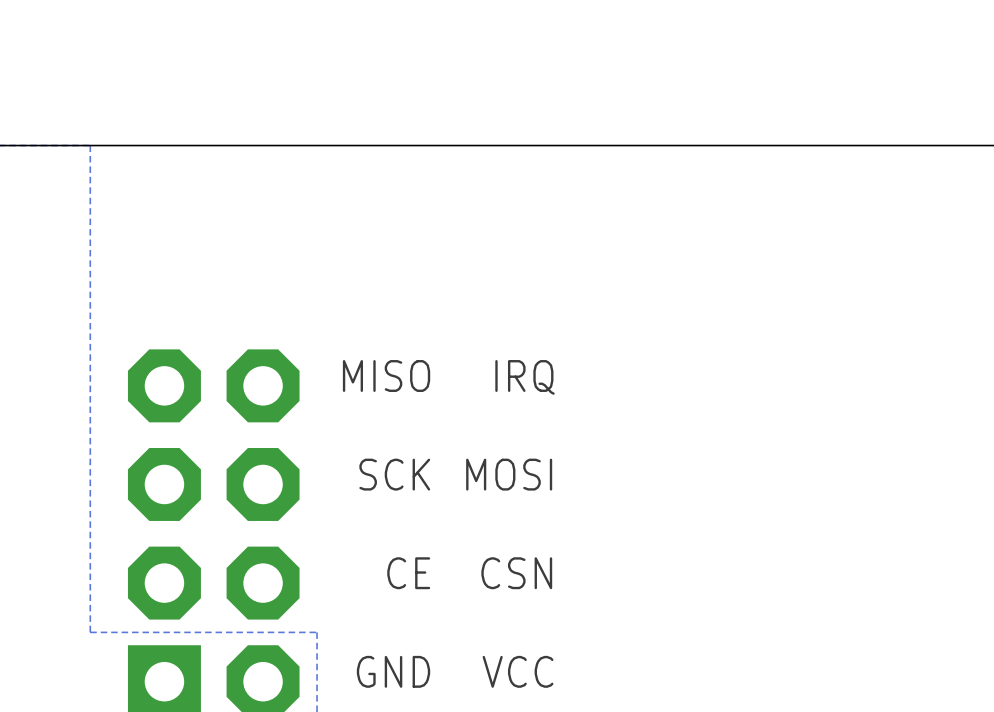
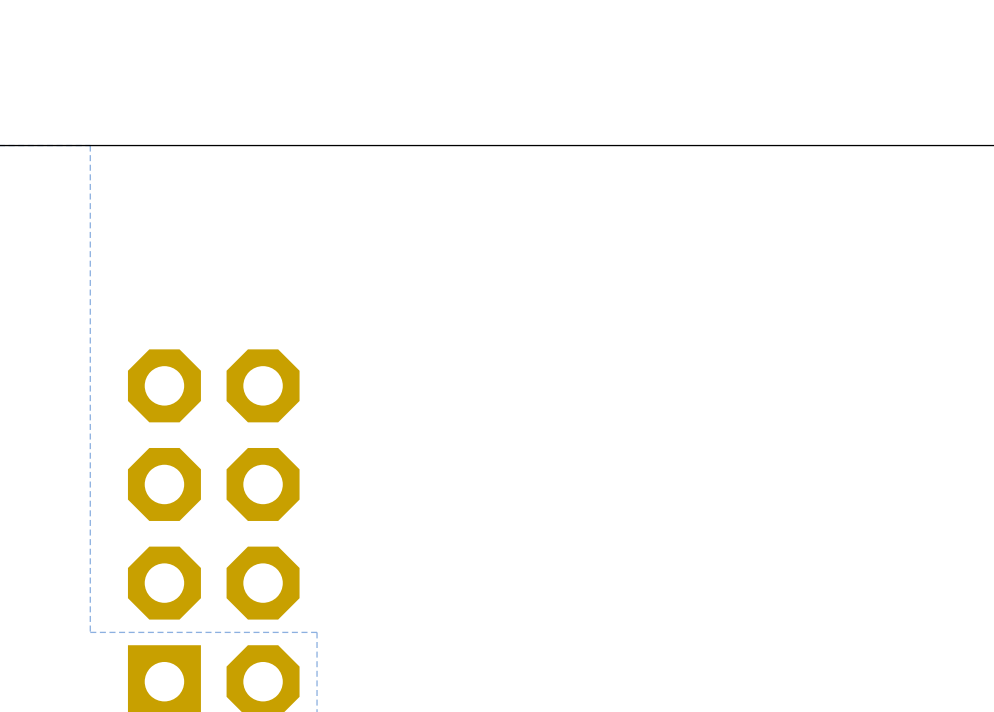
part text: MISO (386, 376) -> none
part text: IRQ (525, 377) -> none
part text: SCK (394, 474) -> none
part text: MOSI (509, 474) -> none
part text: CE (408, 573) -> none
part text: CSN (516, 573) -> none
part text: GND (393, 671) -> none
part text: VCC (518, 671) -> none

